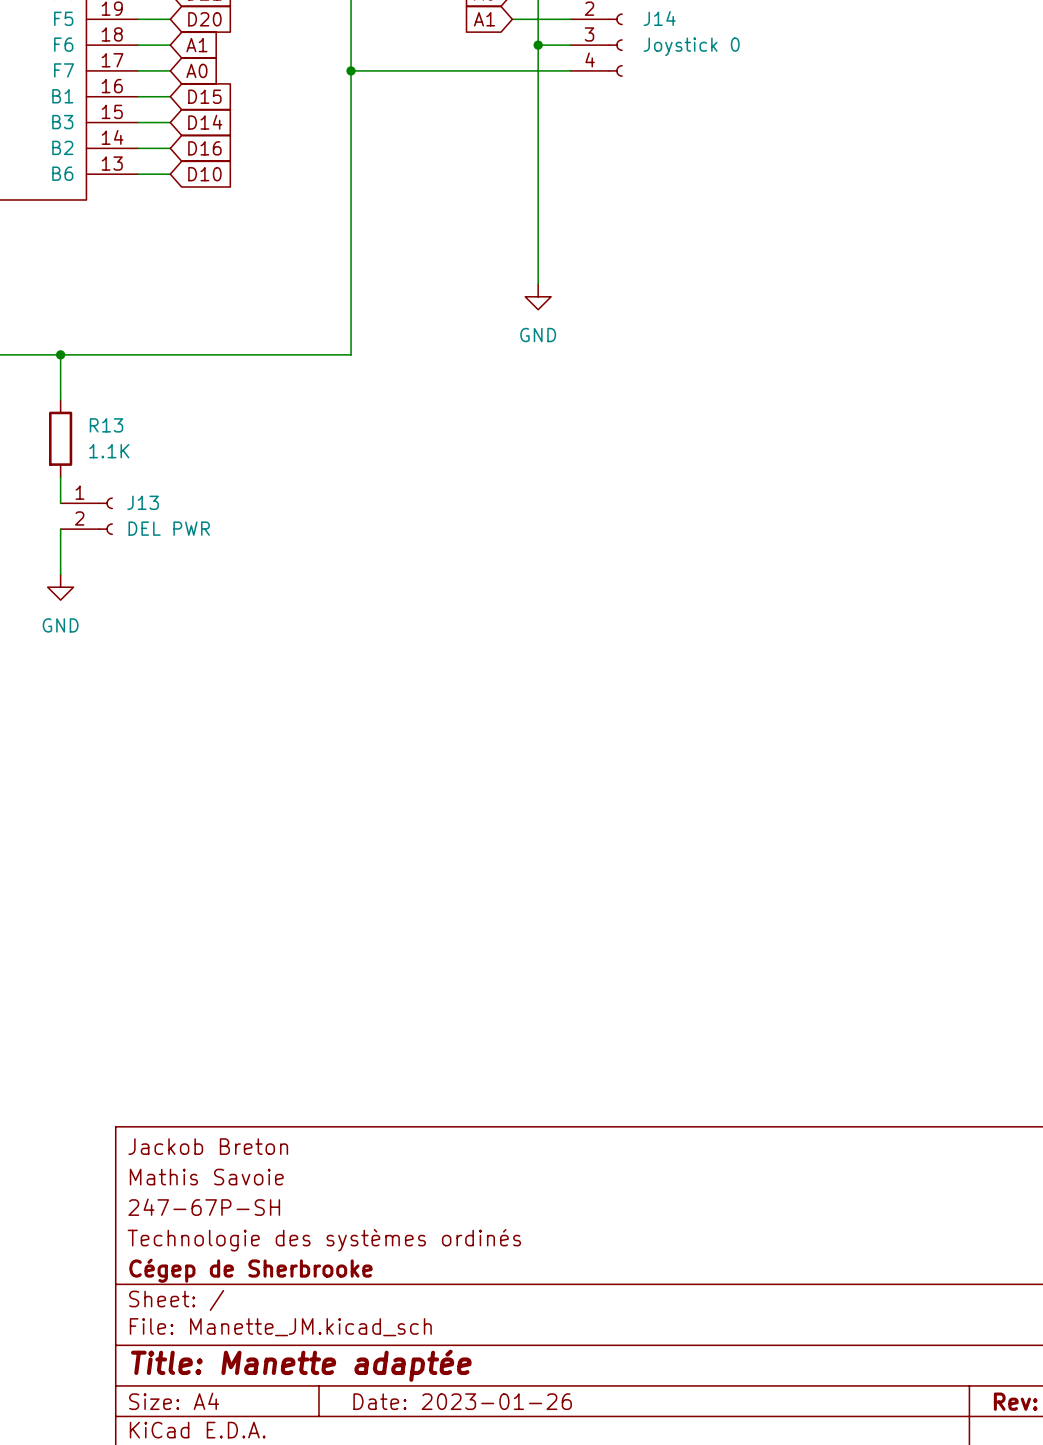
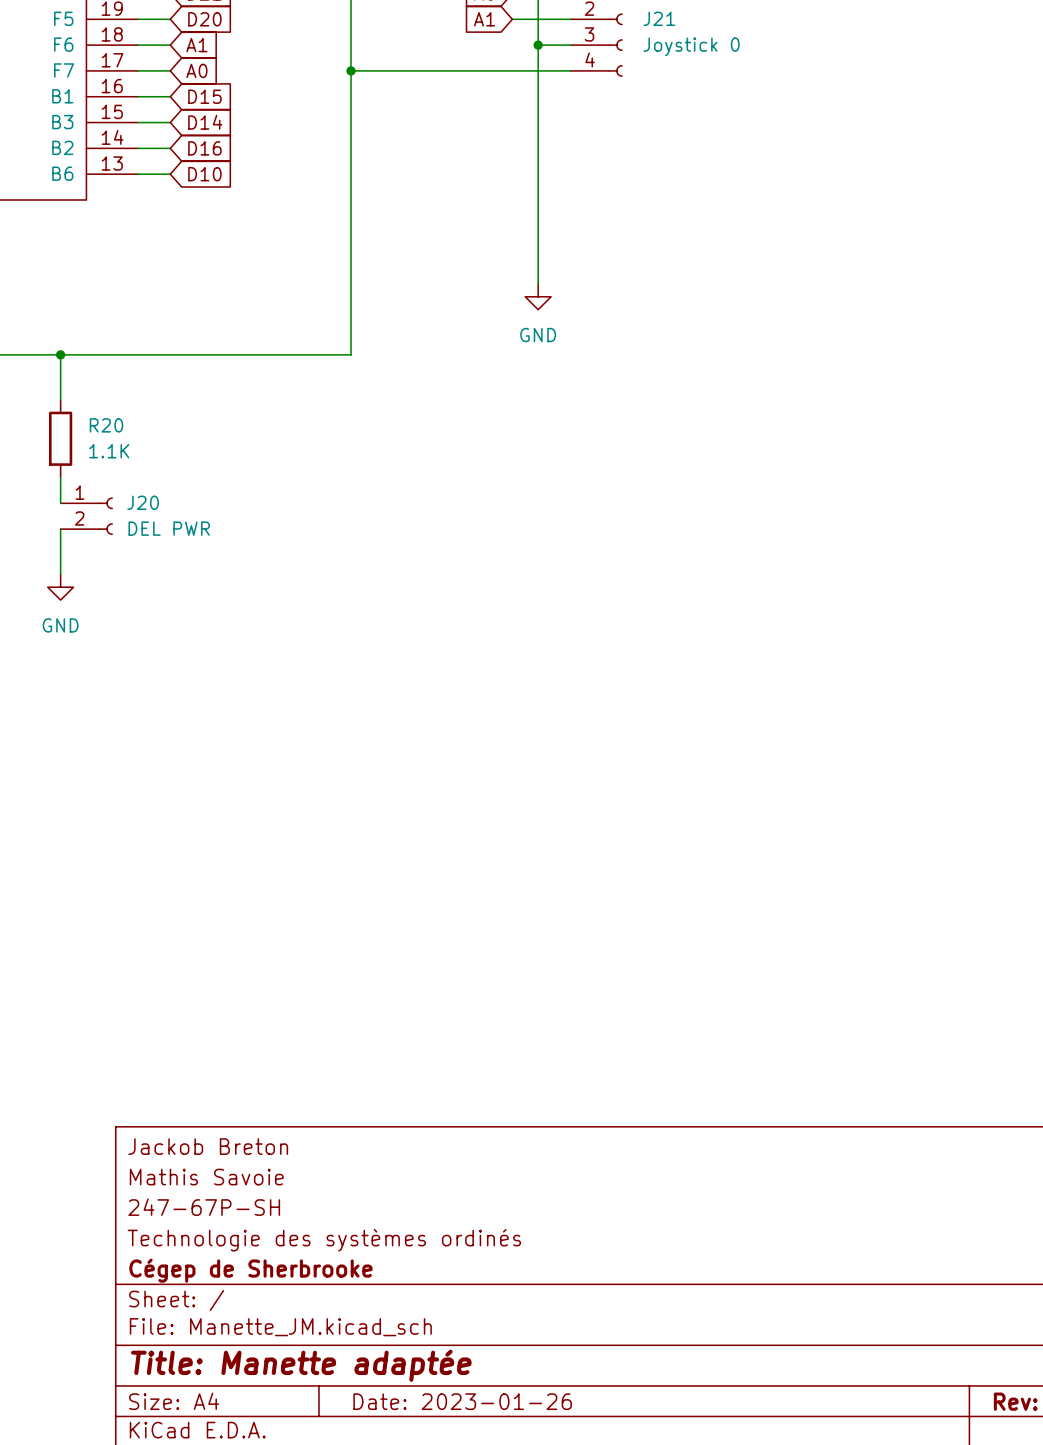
J14 name: J14 (659, 18) -> J21 (659, 18)
R13 name: R13 (106, 425) -> R20 (106, 425)
J13 name: J13 (143, 502) -> J20 (143, 502)

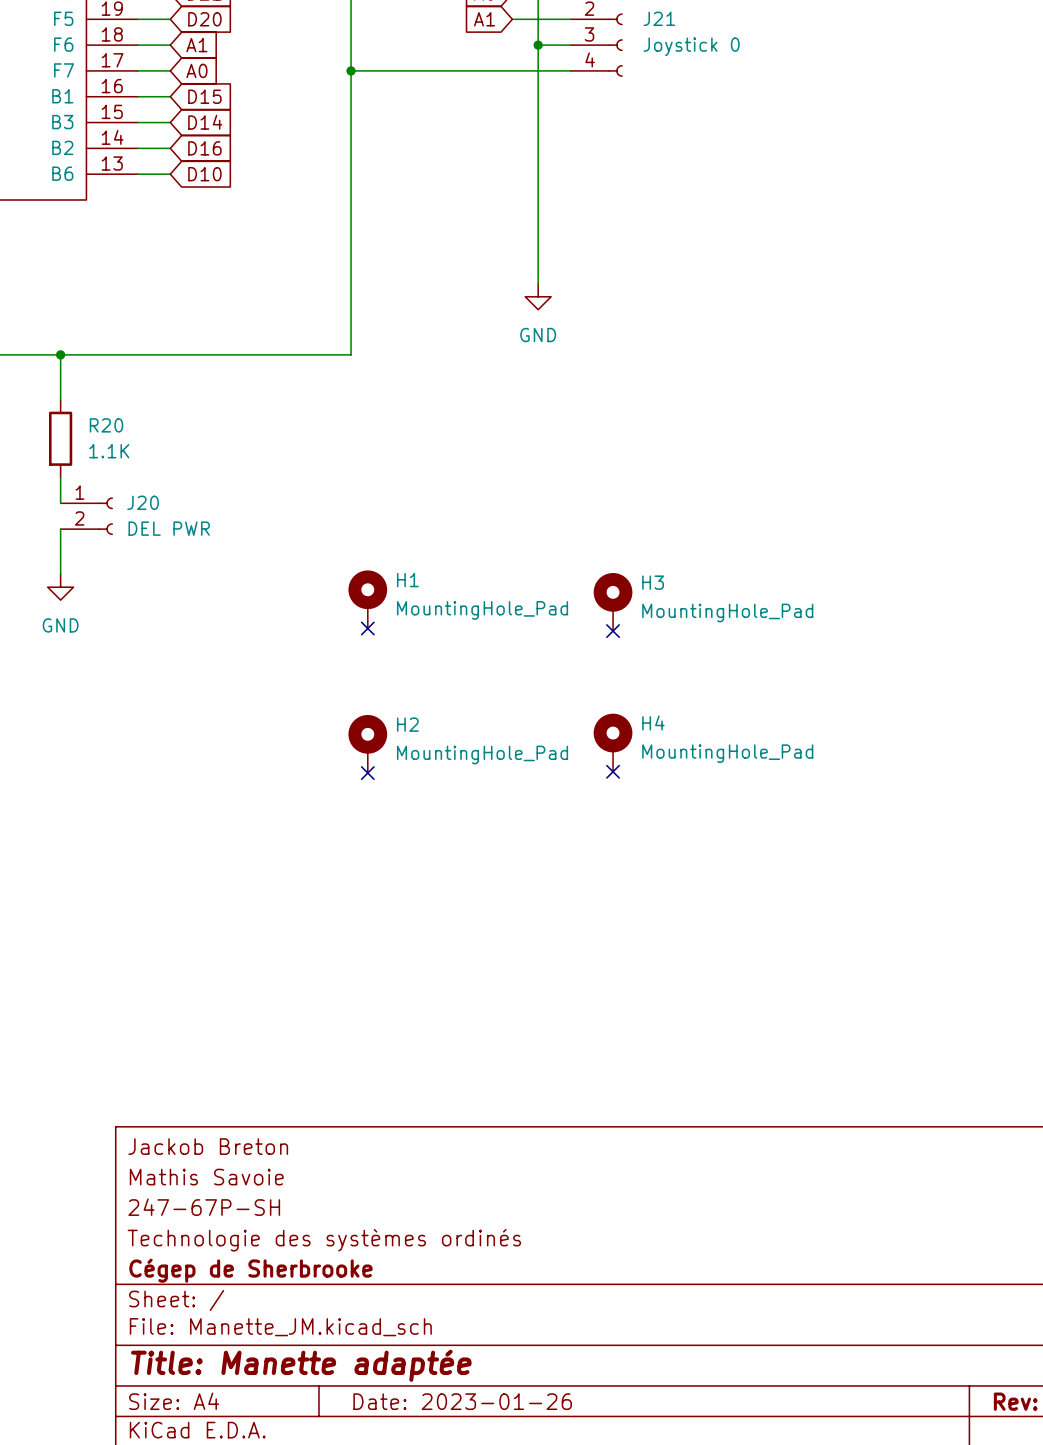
H1: none -> MountingHole_Pad (367, 599)
H3: none -> MountingHole_Pad (613, 602)
no-connect mark: none -> (367, 628)
no-connect mark: none -> (613, 631)
H4: none -> MountingHole_Pad (613, 742)
H2: none -> MountingHole_Pad (367, 744)
no-connect mark: none -> (613, 771)
no-connect mark: none -> (367, 773)

